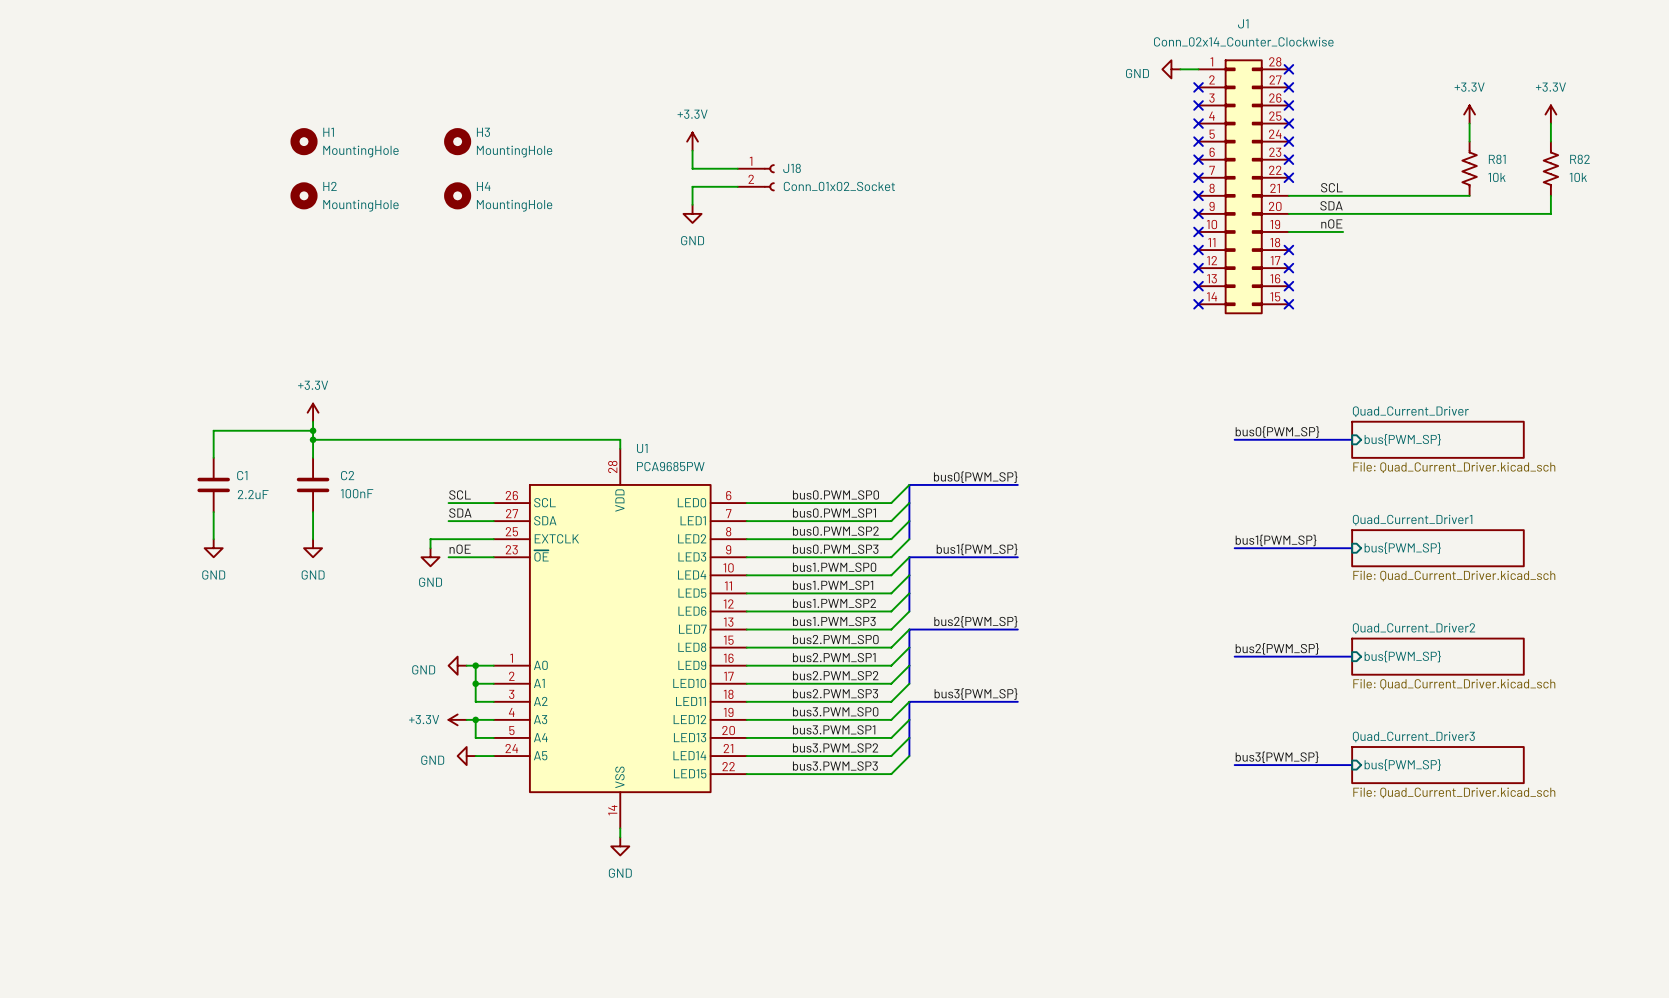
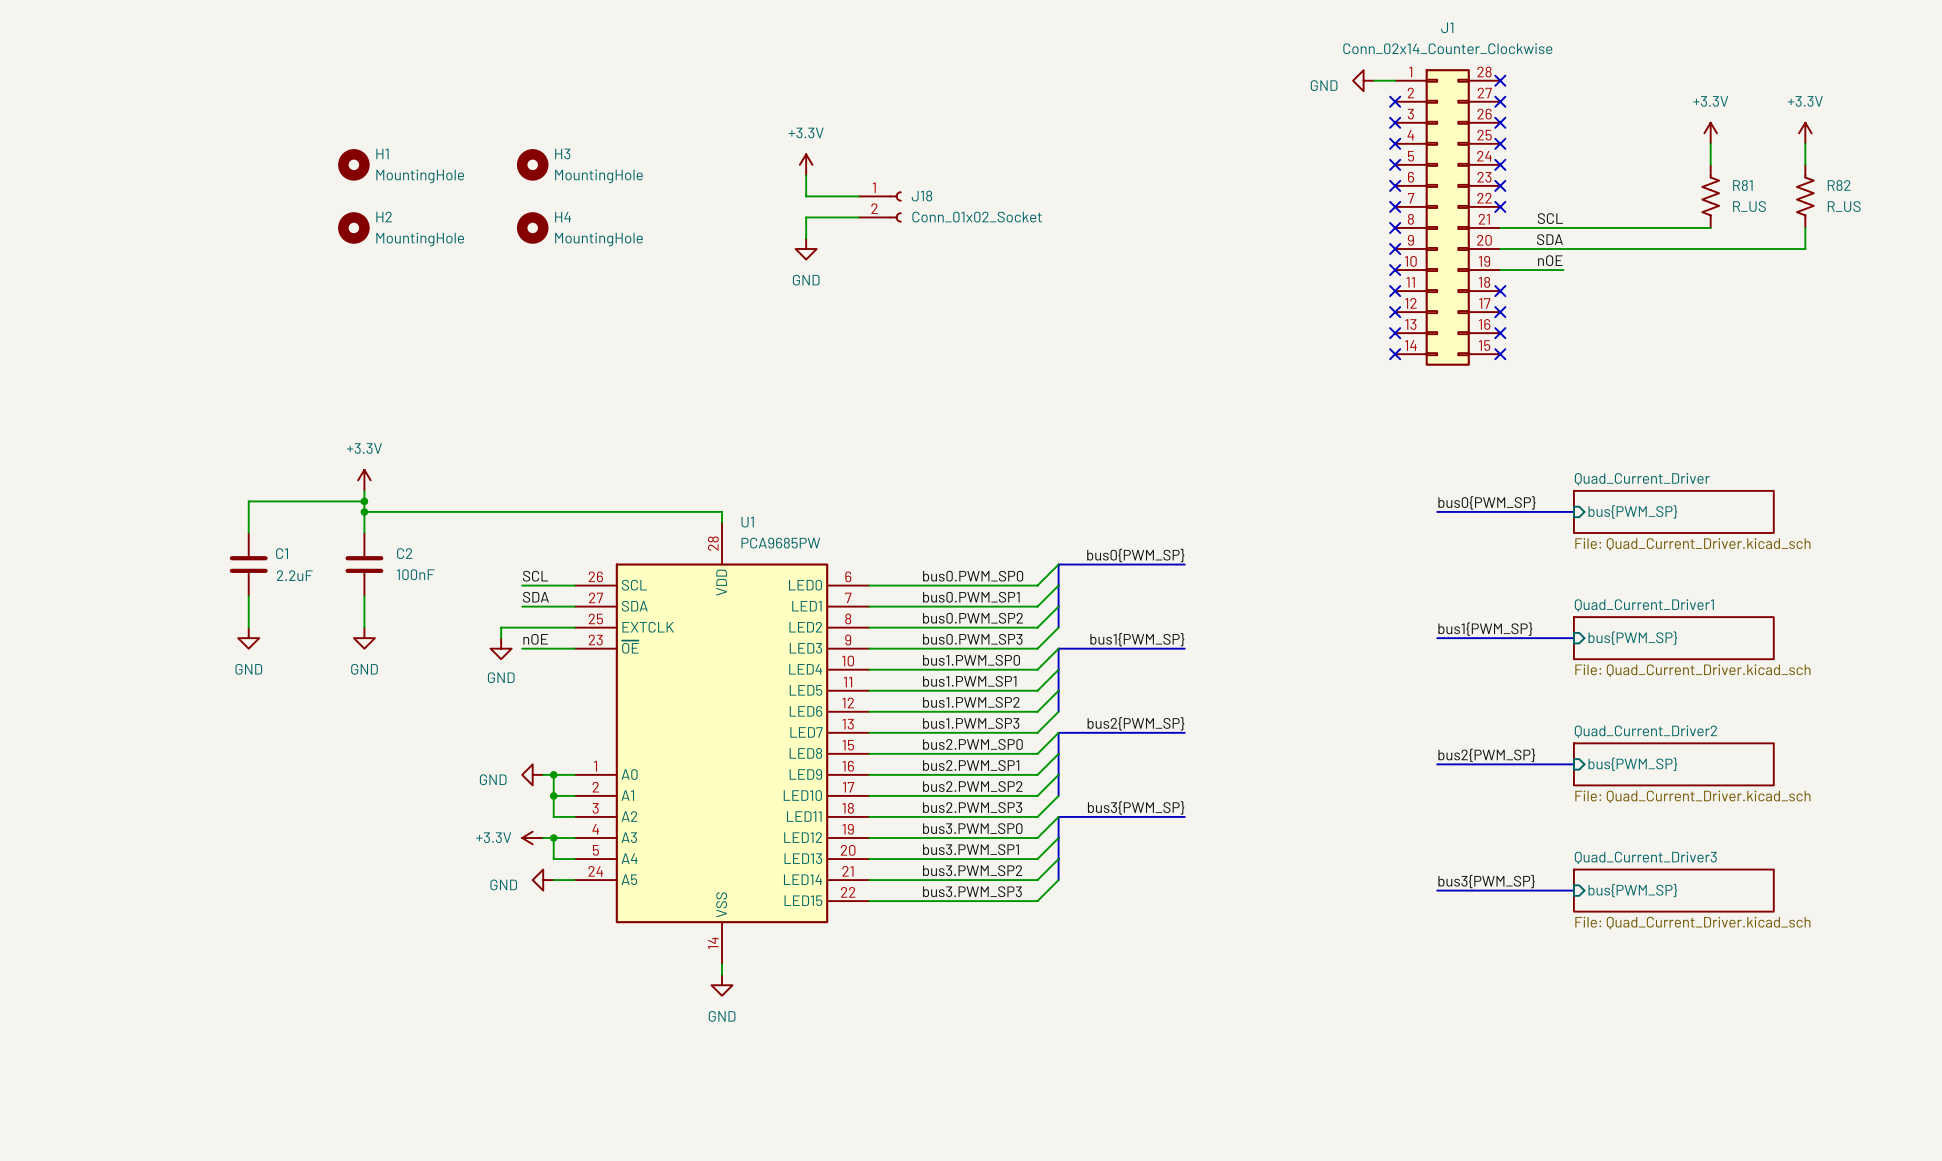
R81 value: 10k (1496, 177) -> R_US (1749, 206)
R82 value: 10k (1578, 177) -> R_US (1844, 206)

